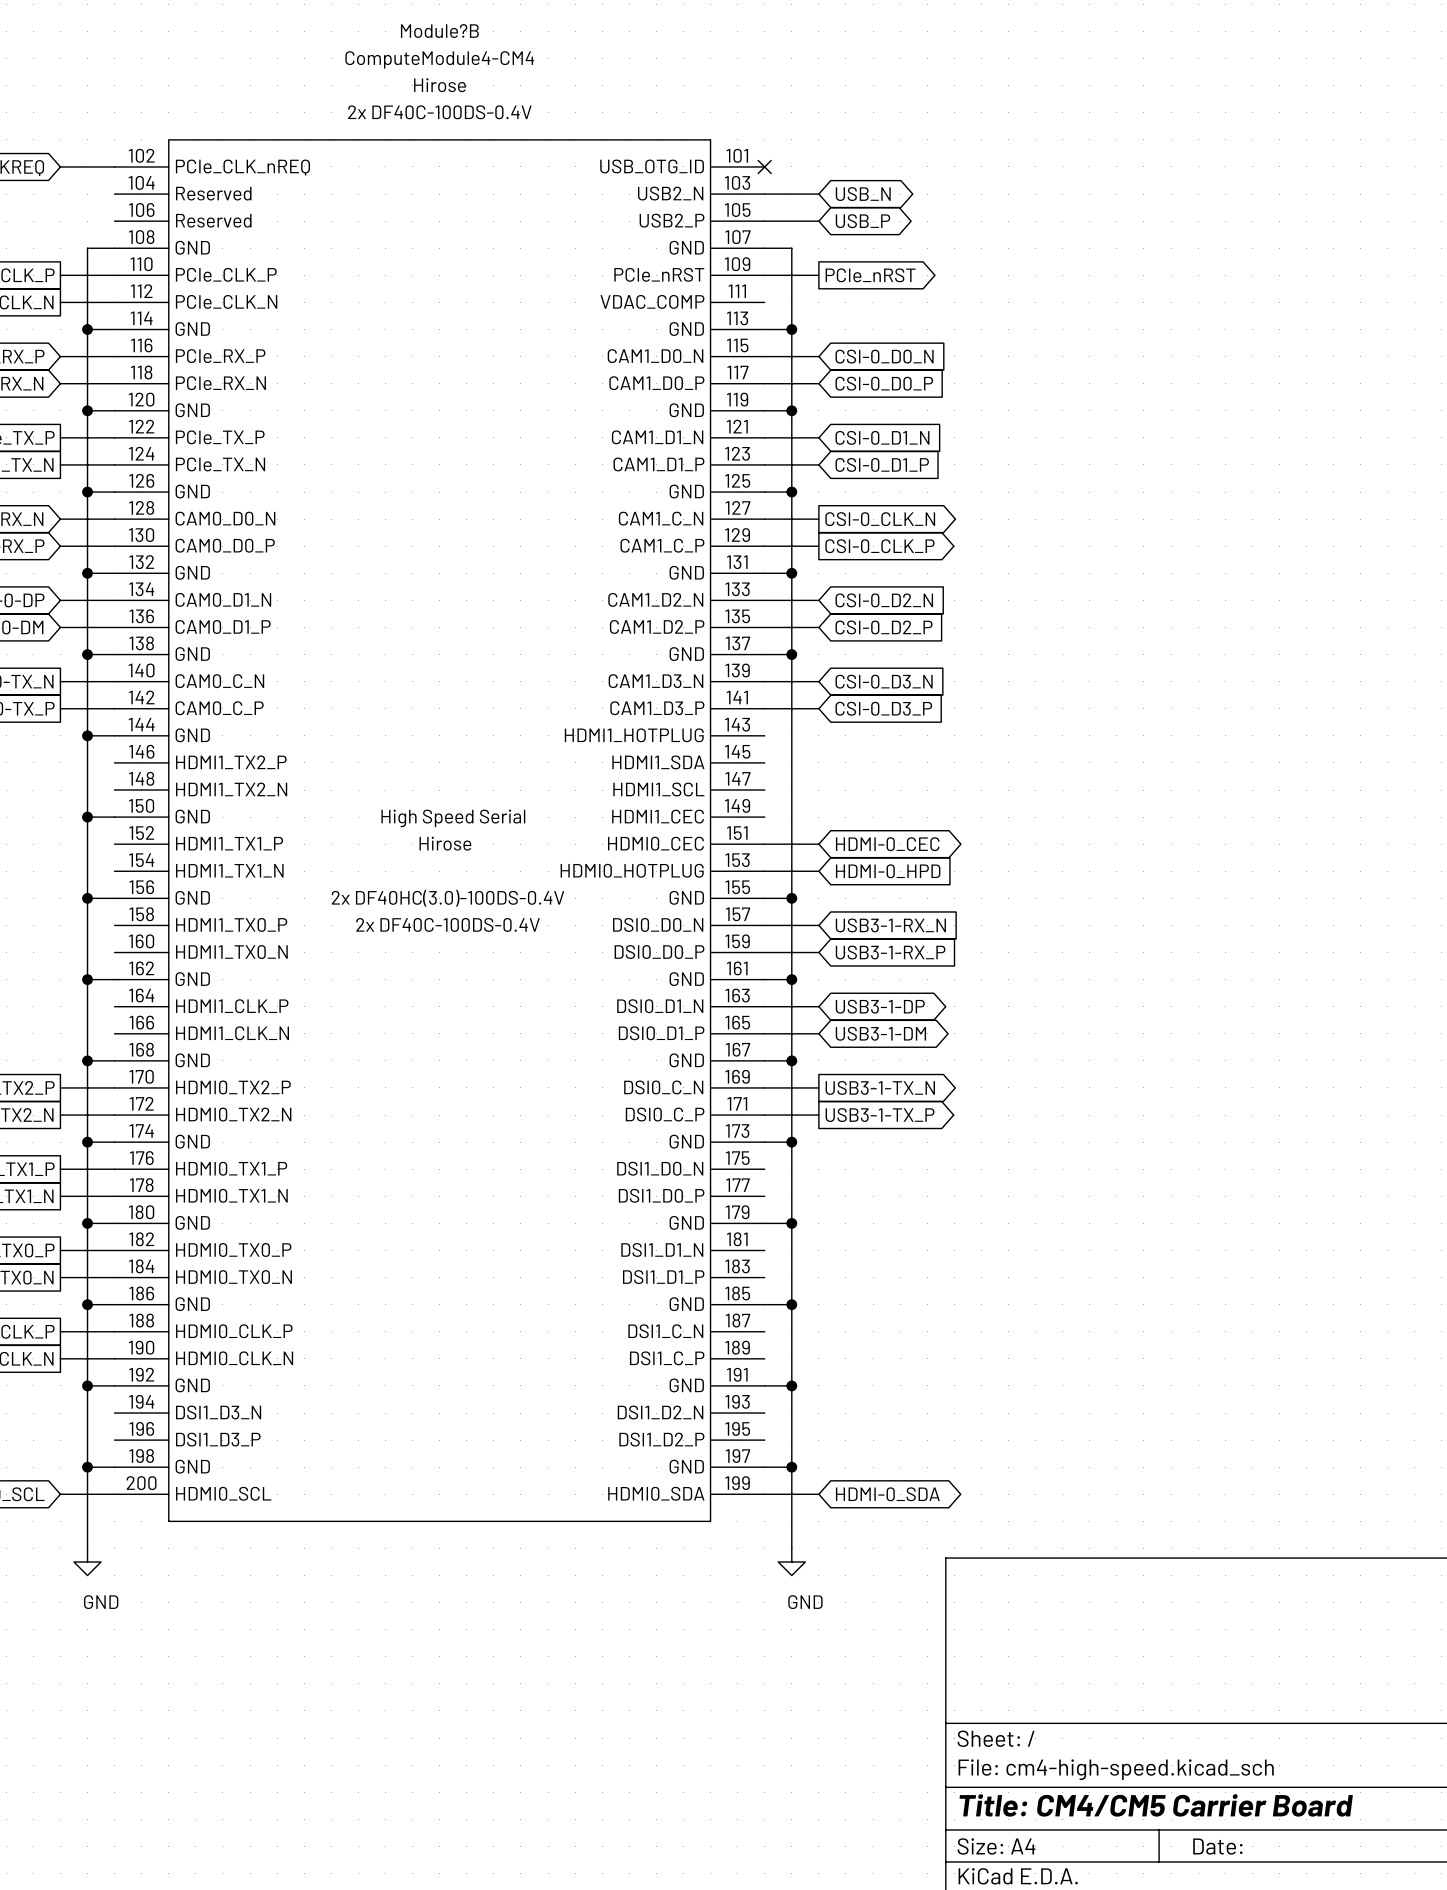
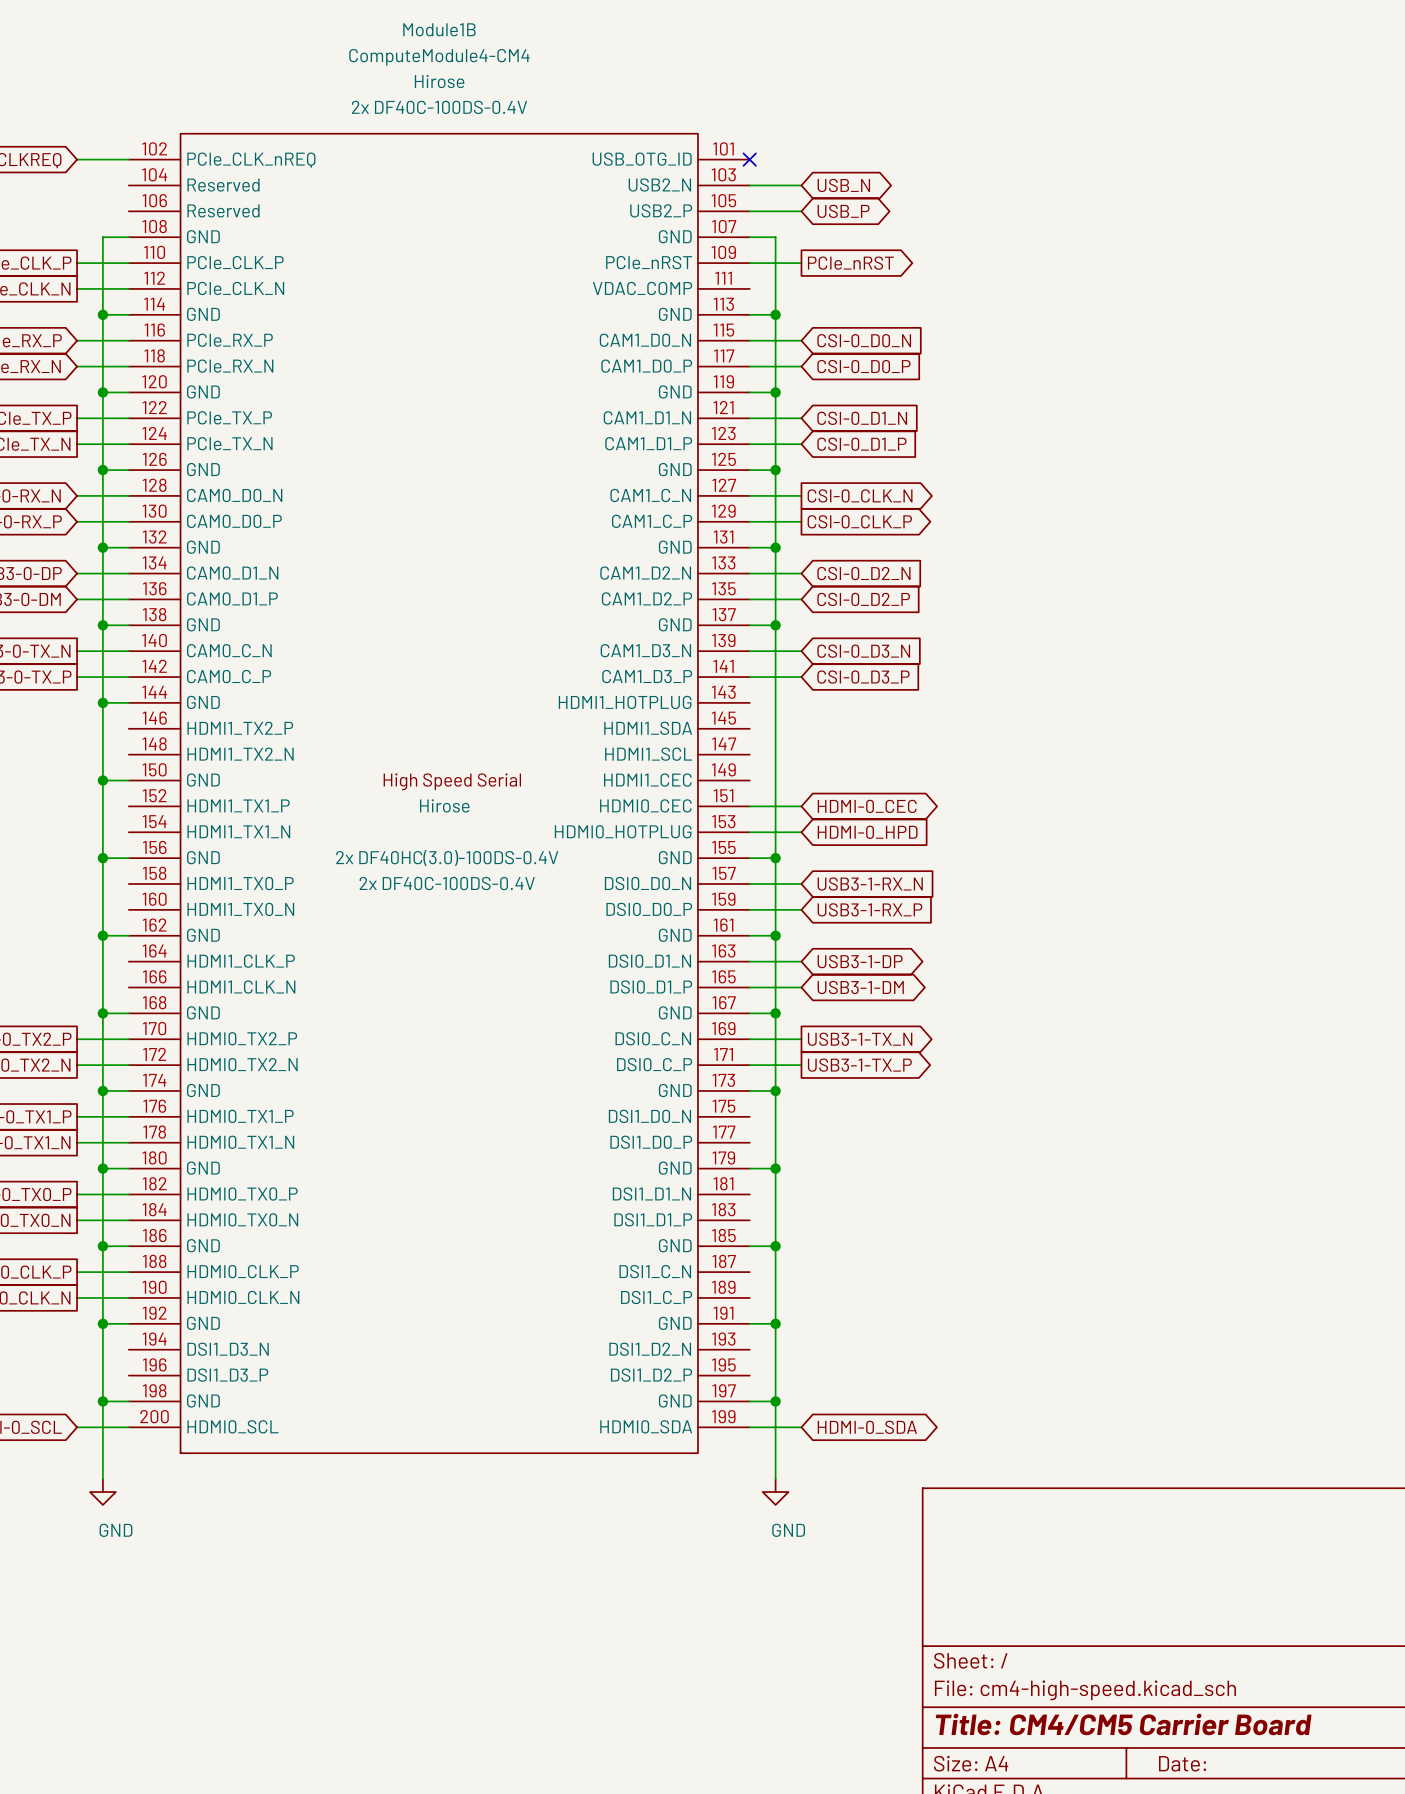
Module?B name: Module?B (439, 31) -> Module1B (439, 29)

